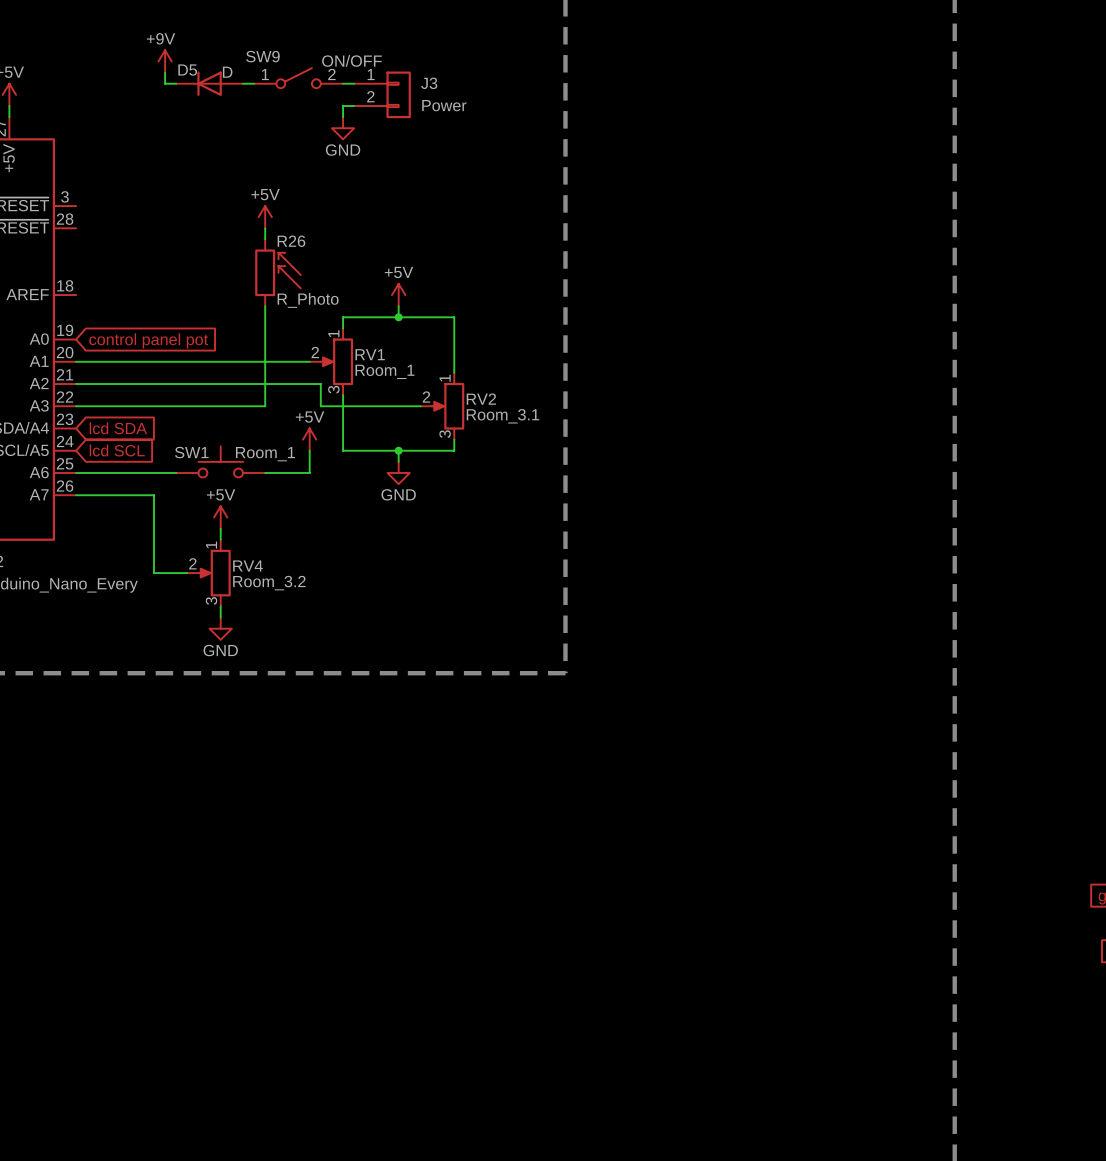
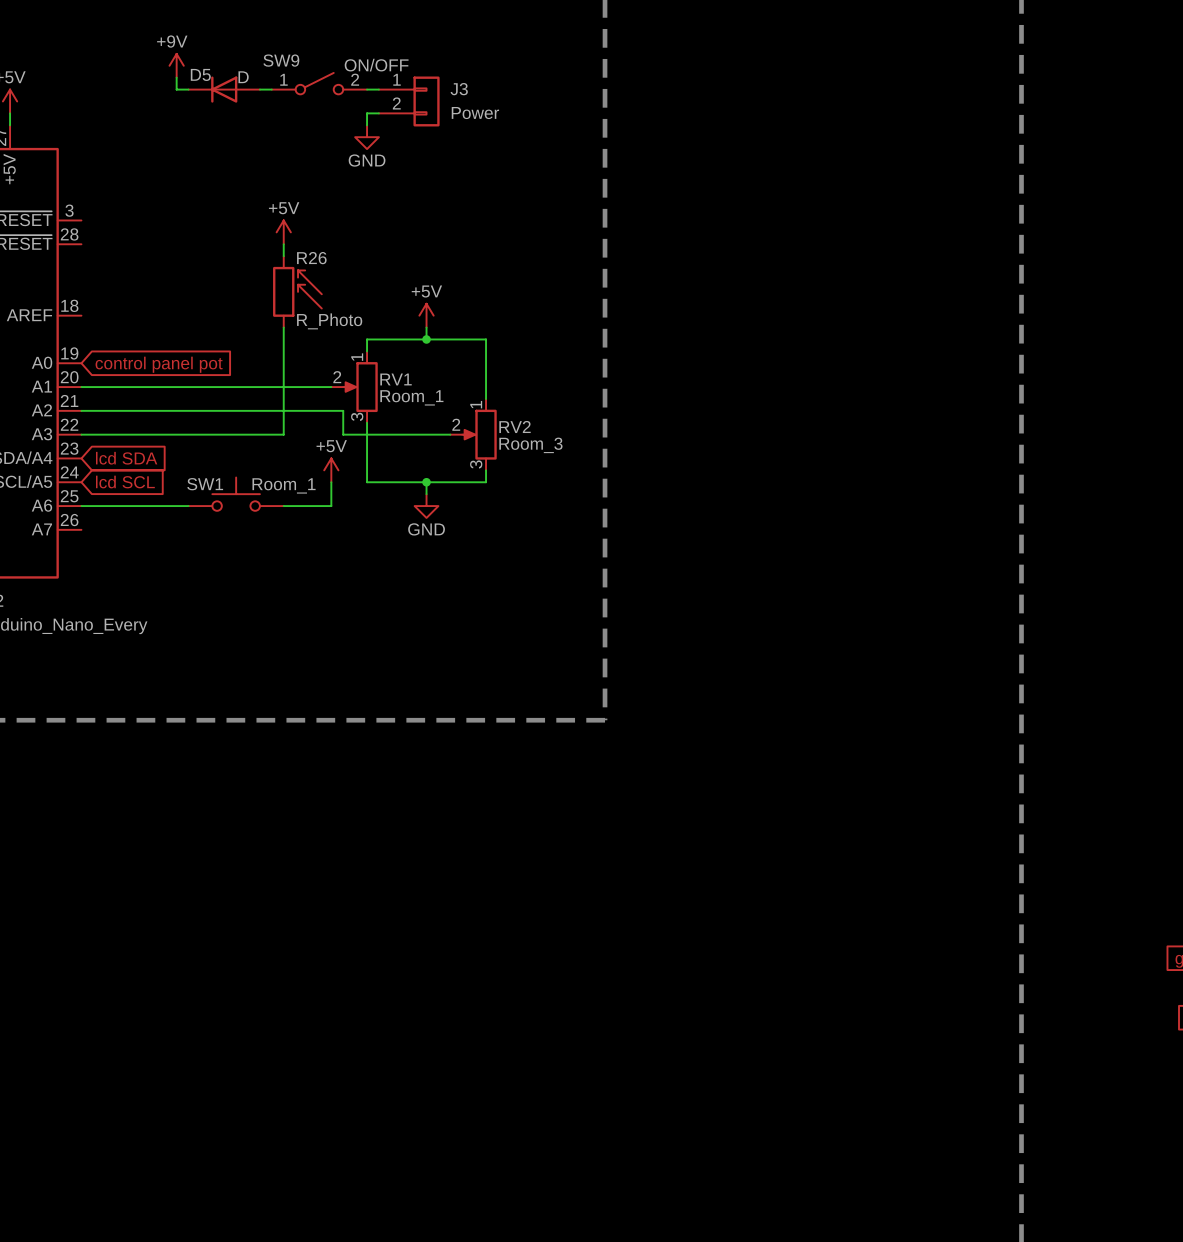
RV2 value: Room_3.1 (502, 416) -> Room_3 (530, 445)
wire: (76, 495) (153, 495) (153, 573) (187, 573) -> none
power symbol: +5V (220, 517) -> none
wire: (220, 528) (220, 539) -> none
RV4: Room_3.2 (209, 573) -> none
wire: (220, 606) (220, 617) -> none
power symbol: GND (220, 628) -> none

